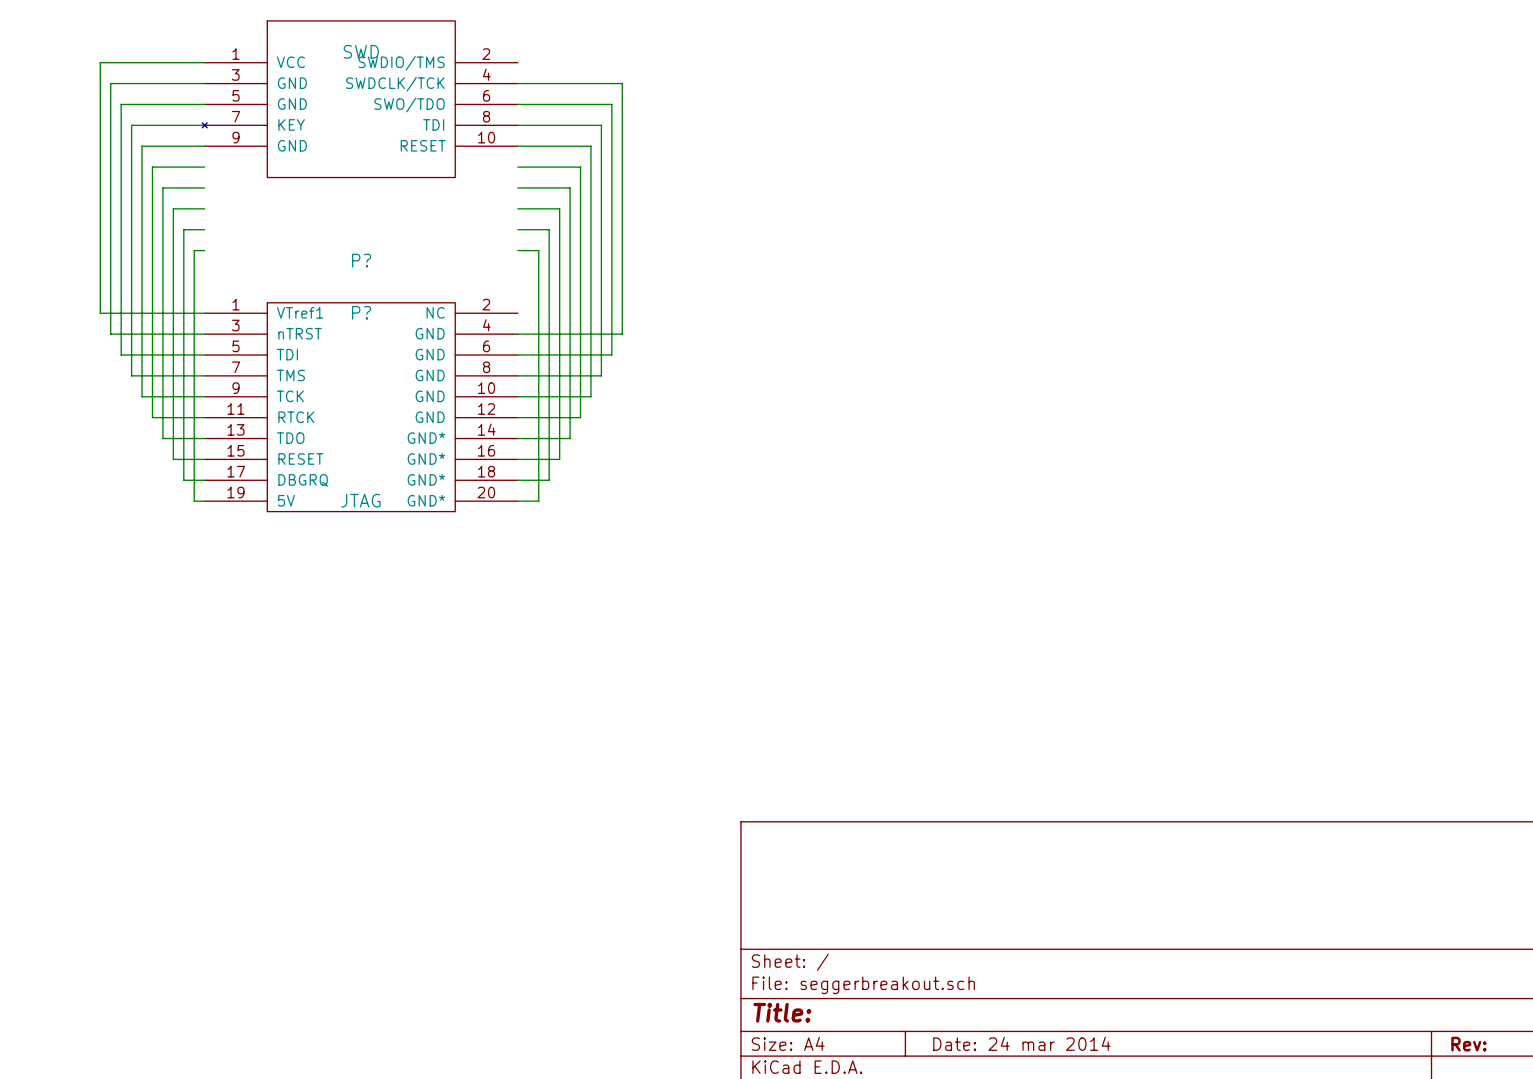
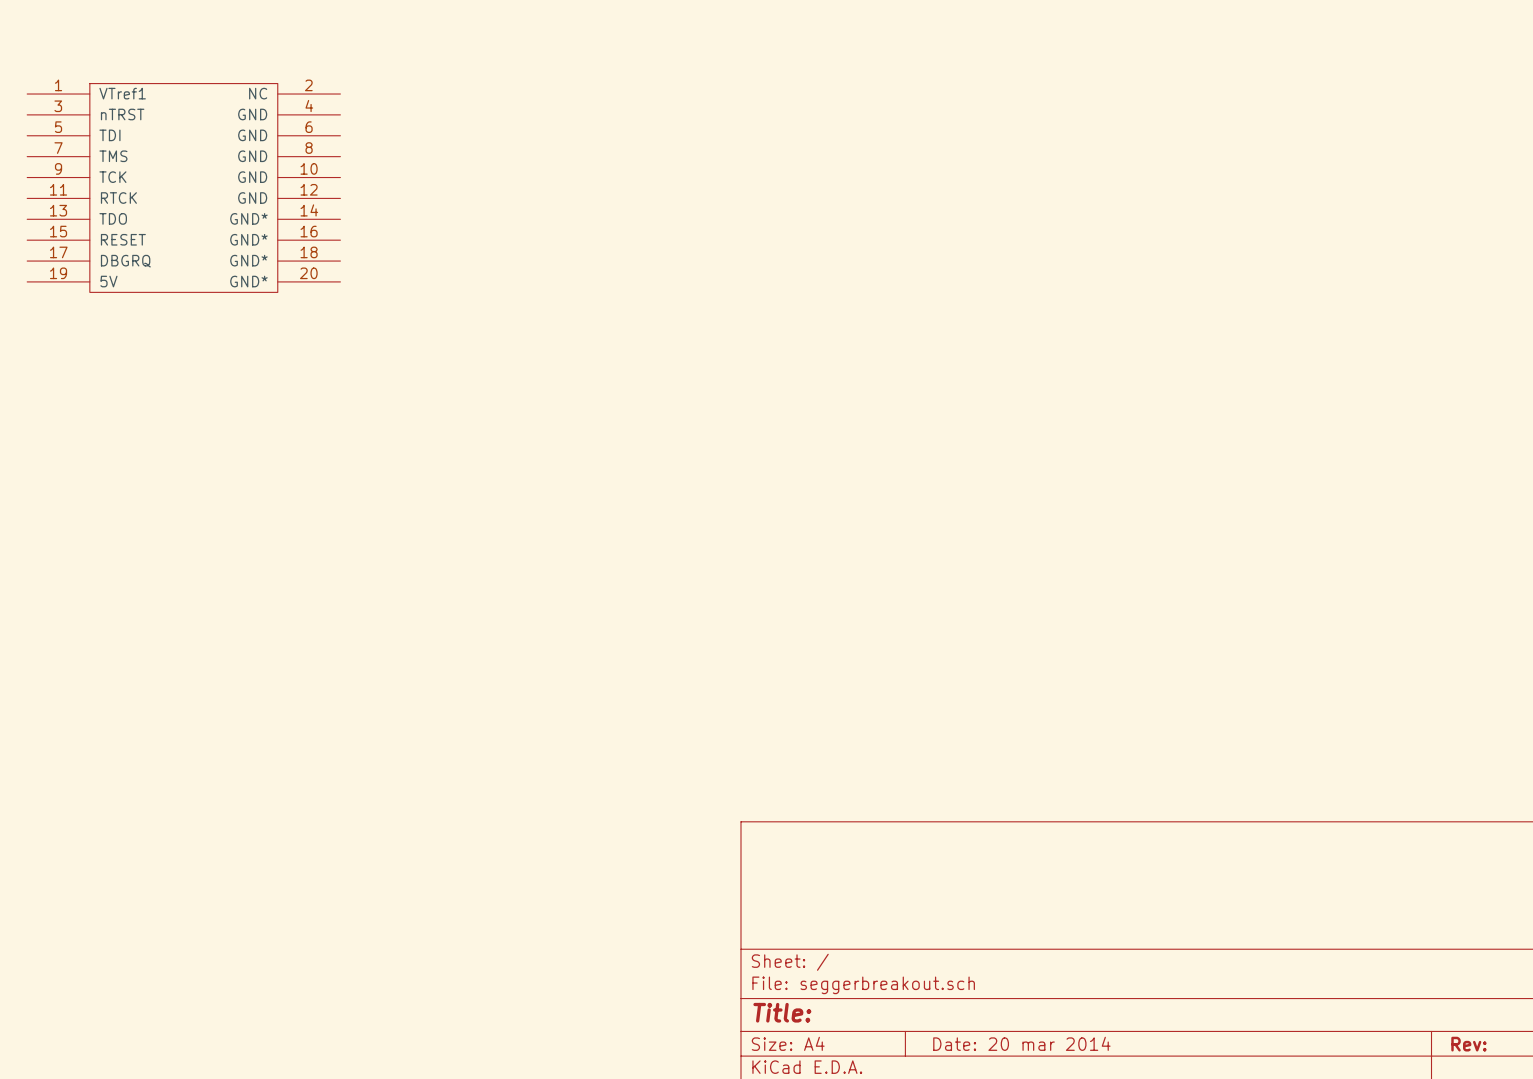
wire: (204, 62) (100, 62) (100, 313) (204, 313) -> none
wire: (204, 83) (110, 83) (110, 334) (204, 334) -> none
wire: (517, 83) (622, 83) (622, 334) (517, 334) -> none
P?: SWD (360, 99) -> none
wire: (204, 104) (121, 104) (121, 355) (204, 355) -> none
wire: (517, 104) (611, 104) (611, 355) (517, 355) -> none
wire: (204, 125) (131, 125) (131, 375) (204, 375) -> none
wire: (517, 125) (601, 125) (601, 375) (517, 375) -> none
wire: (204, 146) (142, 146) (142, 396) (204, 396) -> none
wire: (517, 146) (590, 146) (590, 396) (517, 396) -> none
wire: (204, 167) (152, 167) (152, 417) (204, 417) -> none
wire: (517, 167) (580, 167) (580, 417) (517, 417) -> none
part: none -> (183, 187)
wire: (204, 187) (162, 187) (162, 438) (204, 438) -> none
wire: (517, 187) (570, 187) (570, 438) (517, 438) -> none
wire: (204, 208) (173, 208) (173, 459) (204, 459) -> none
wire: (517, 208) (559, 208) (559, 459) (517, 459) -> none
wire: (204, 229) (183, 229) (183, 480) (204, 480) -> none
wire: (517, 229) (549, 229) (549, 480) (517, 480) -> none
wire: (204, 250) (194, 250) (194, 501) (204, 501) -> none
wire: (517, 250) (538, 250) (538, 501) (517, 501) -> none
P?: JTAG (361, 407) -> none
title block: Date: 24 mar 2014 (1021, 1043) -> Date: 20 mar 2014 (1021, 1043)

